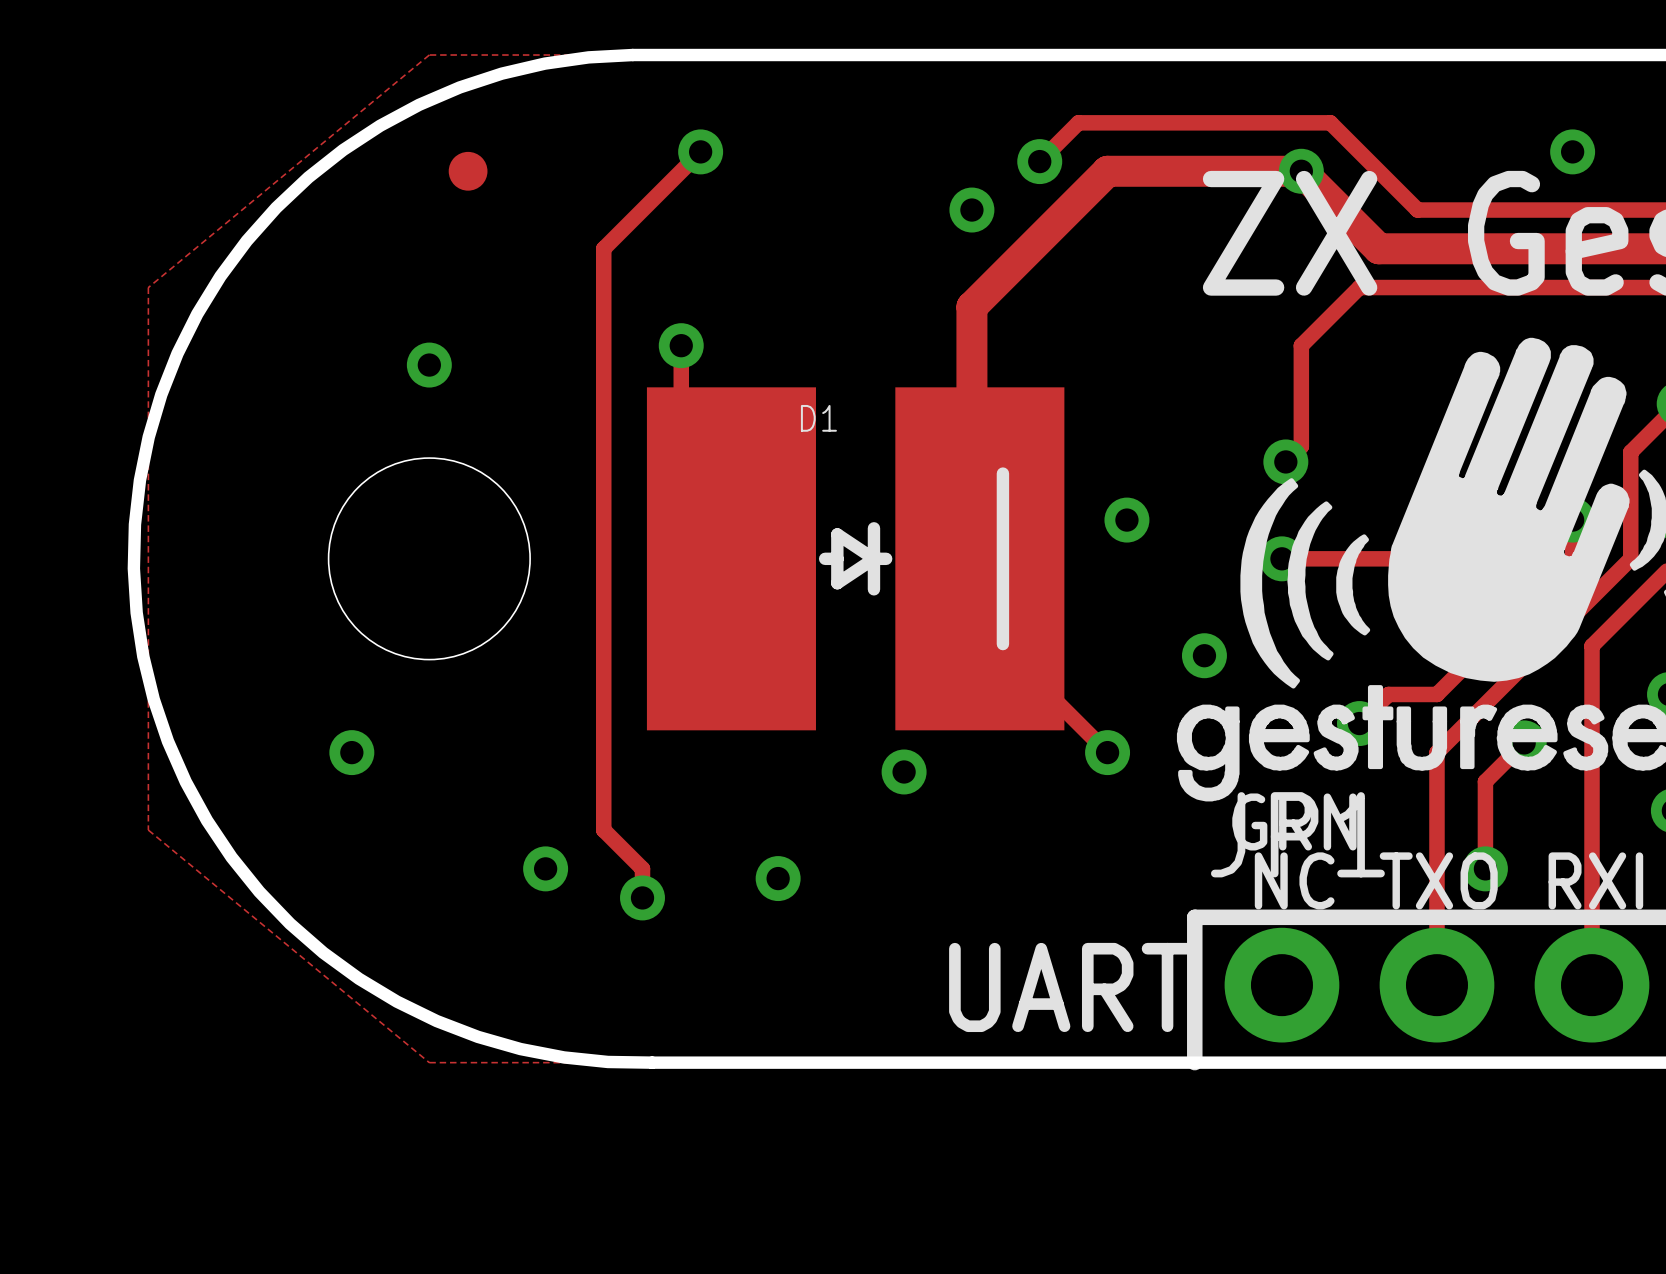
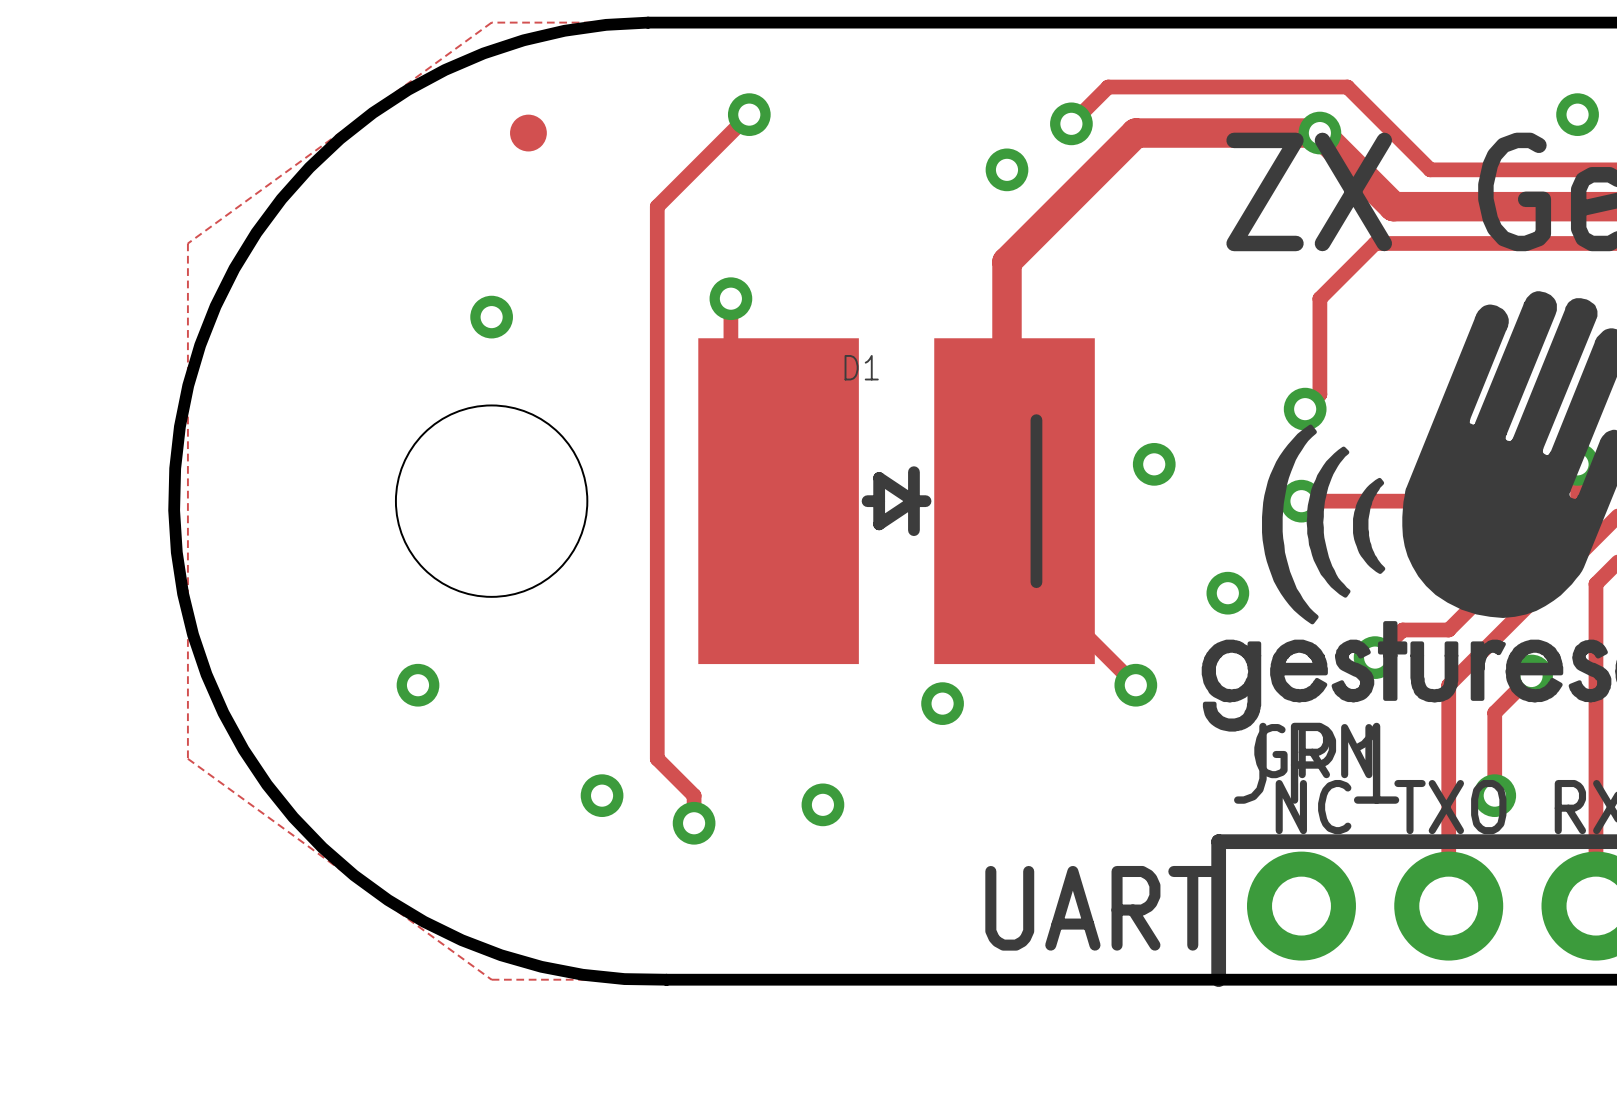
zone outline: (429, 55) (148, 287) (148, 830) (429, 1062) -> (491, 22) (187, 243) (187, 758) (491, 979)
board edge: (632, 55) (588, 57) (544, 63) (501, 73) (459, 87) (419, 104) (380, 125) (343, 150) (308, 177) (276, 207) (246, 240) (220, 276) (197, 313) (177, 353) (161, 394) (148, 437) (139, 480) (134, 524) (133, 568) (136, 612) (143, 656) (153, 699) (167, 741) (185, 781) (207, 820) (231, 857) (259, 891) (290, 923) (323, 952) (359, 978) (396, 1001) (436, 1021) (478, 1036) (520, 1049) (563, 1057) (607, 1061) (652, 1062) -> (684, 22) (606, 24) (564, 30) (523, 40) (483, 53) (445, 69) (408, 89) (372, 112) (339, 138) (309, 167) (281, 199) (256, 232) (234, 268) (215, 306) (200, 345) (188, 385) (179, 426) (175, 468) (174, 510) (176, 552) (183, 593) (193, 634) (206, 674) (223, 712) (243, 749) (267, 784) (293, 817) (322, 847) (354, 875) (388, 900) (424, 921) (461, 940) (501, 955) (541, 966) (582, 974) (624, 979) (703, 979)

